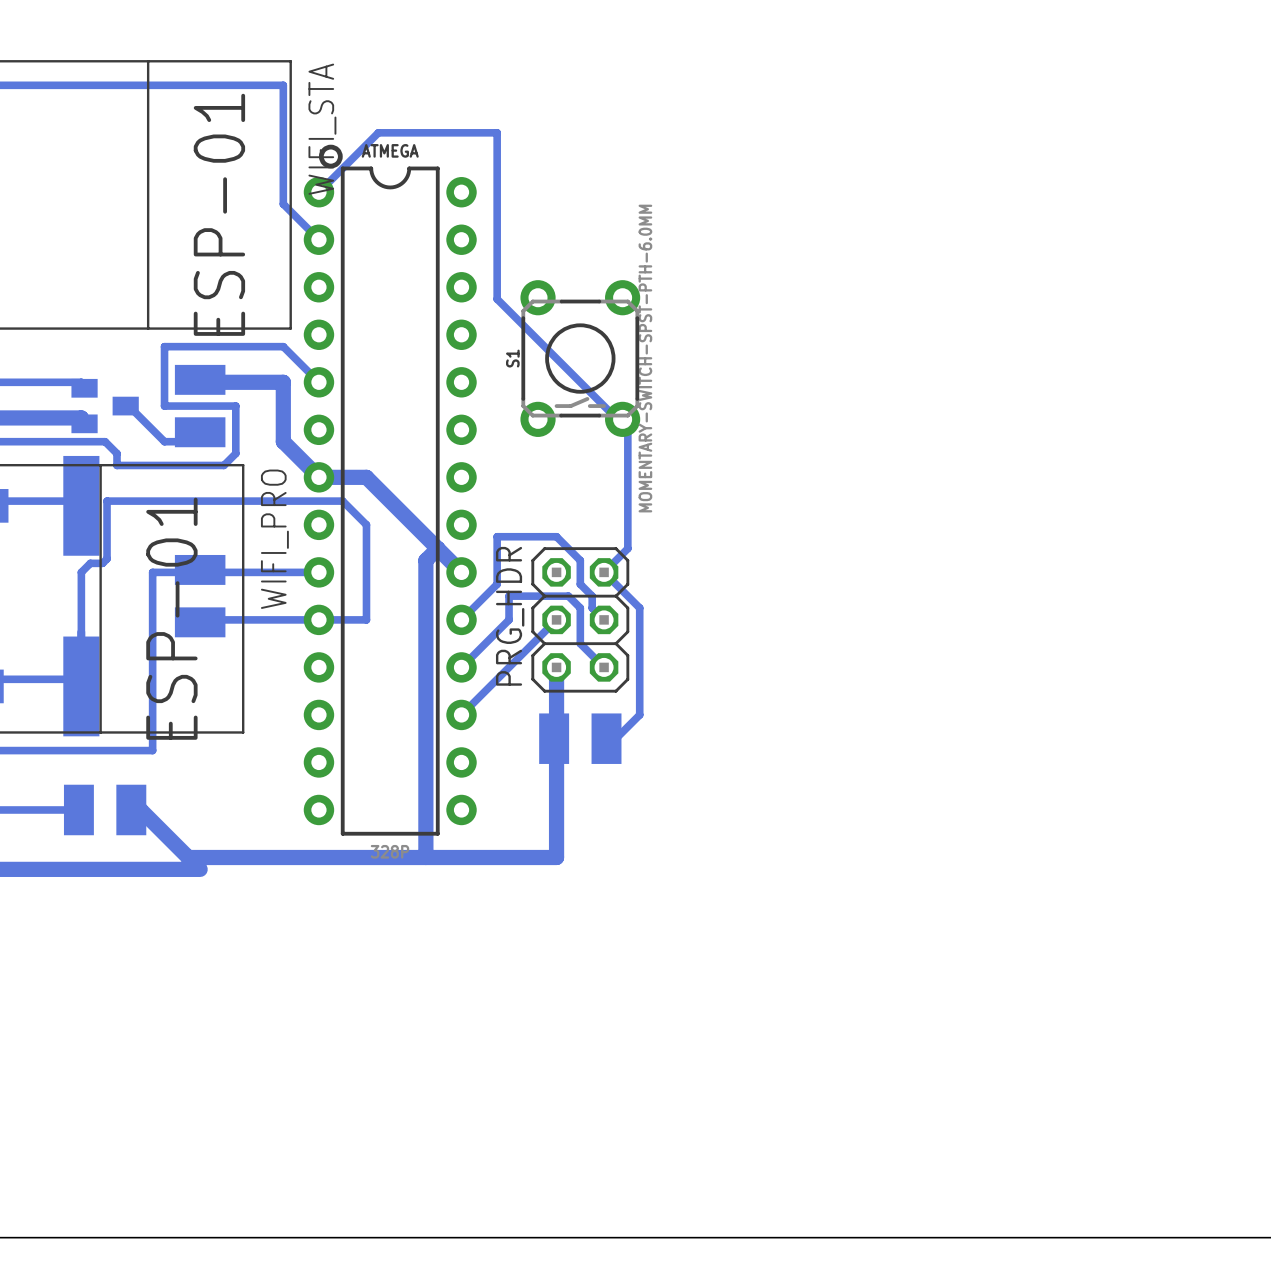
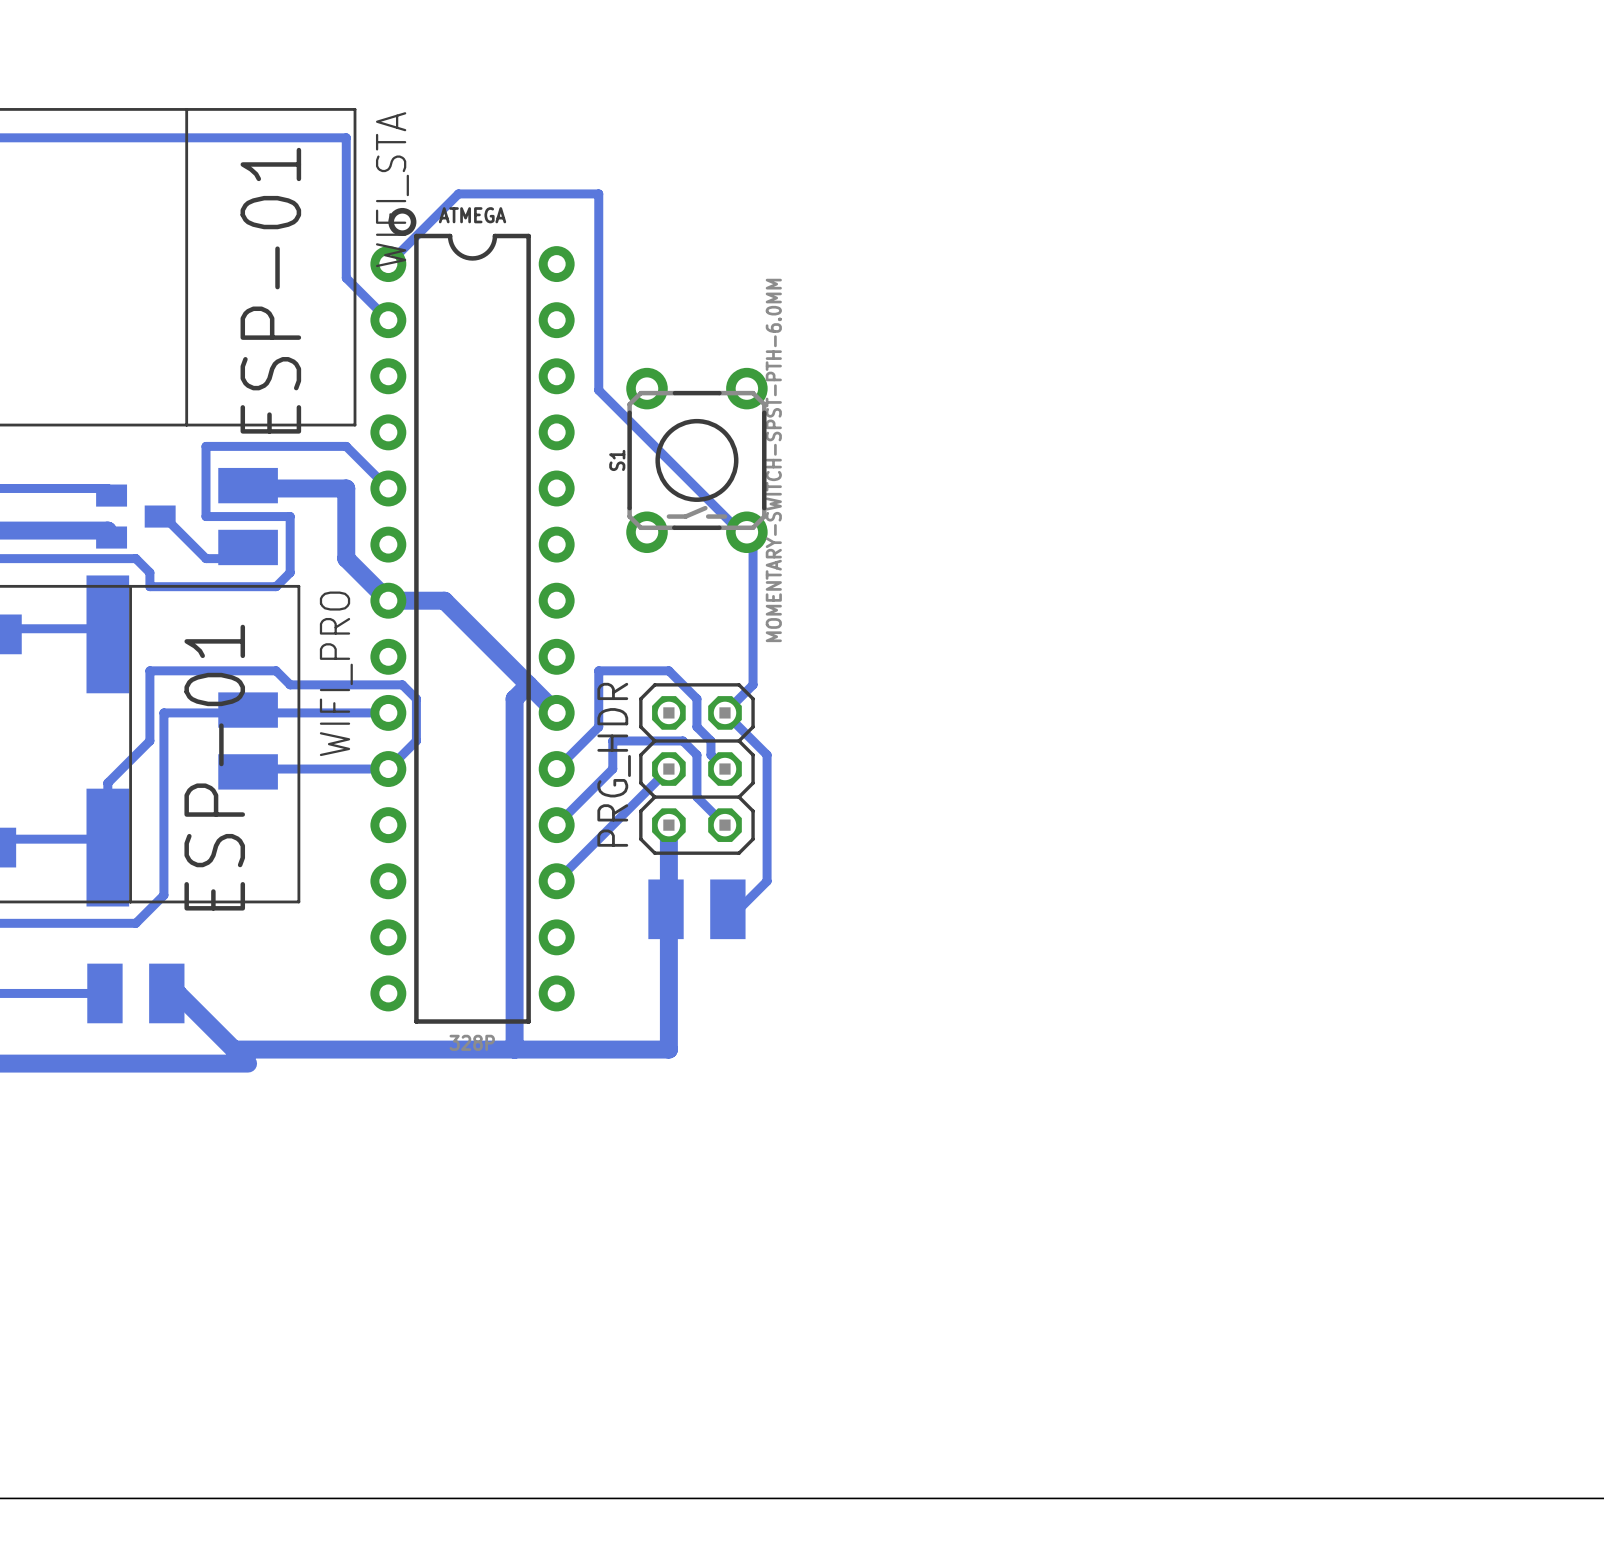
bottom track: (152, 572) (152, 750) (105, 750) -> (191, 712) (163, 712) (163, 895) (135, 923)
bottom track: (318, 619) (366, 619) (366, 524) (342, 501) (107, 501) (107, 558) (102, 563) (90, 563) (81, 572) (81, 631) -> (388, 769) (416, 740) (416, 698) (402, 684) (290, 684) (276, 670) (149, 670) (149, 740) (107, 783)

